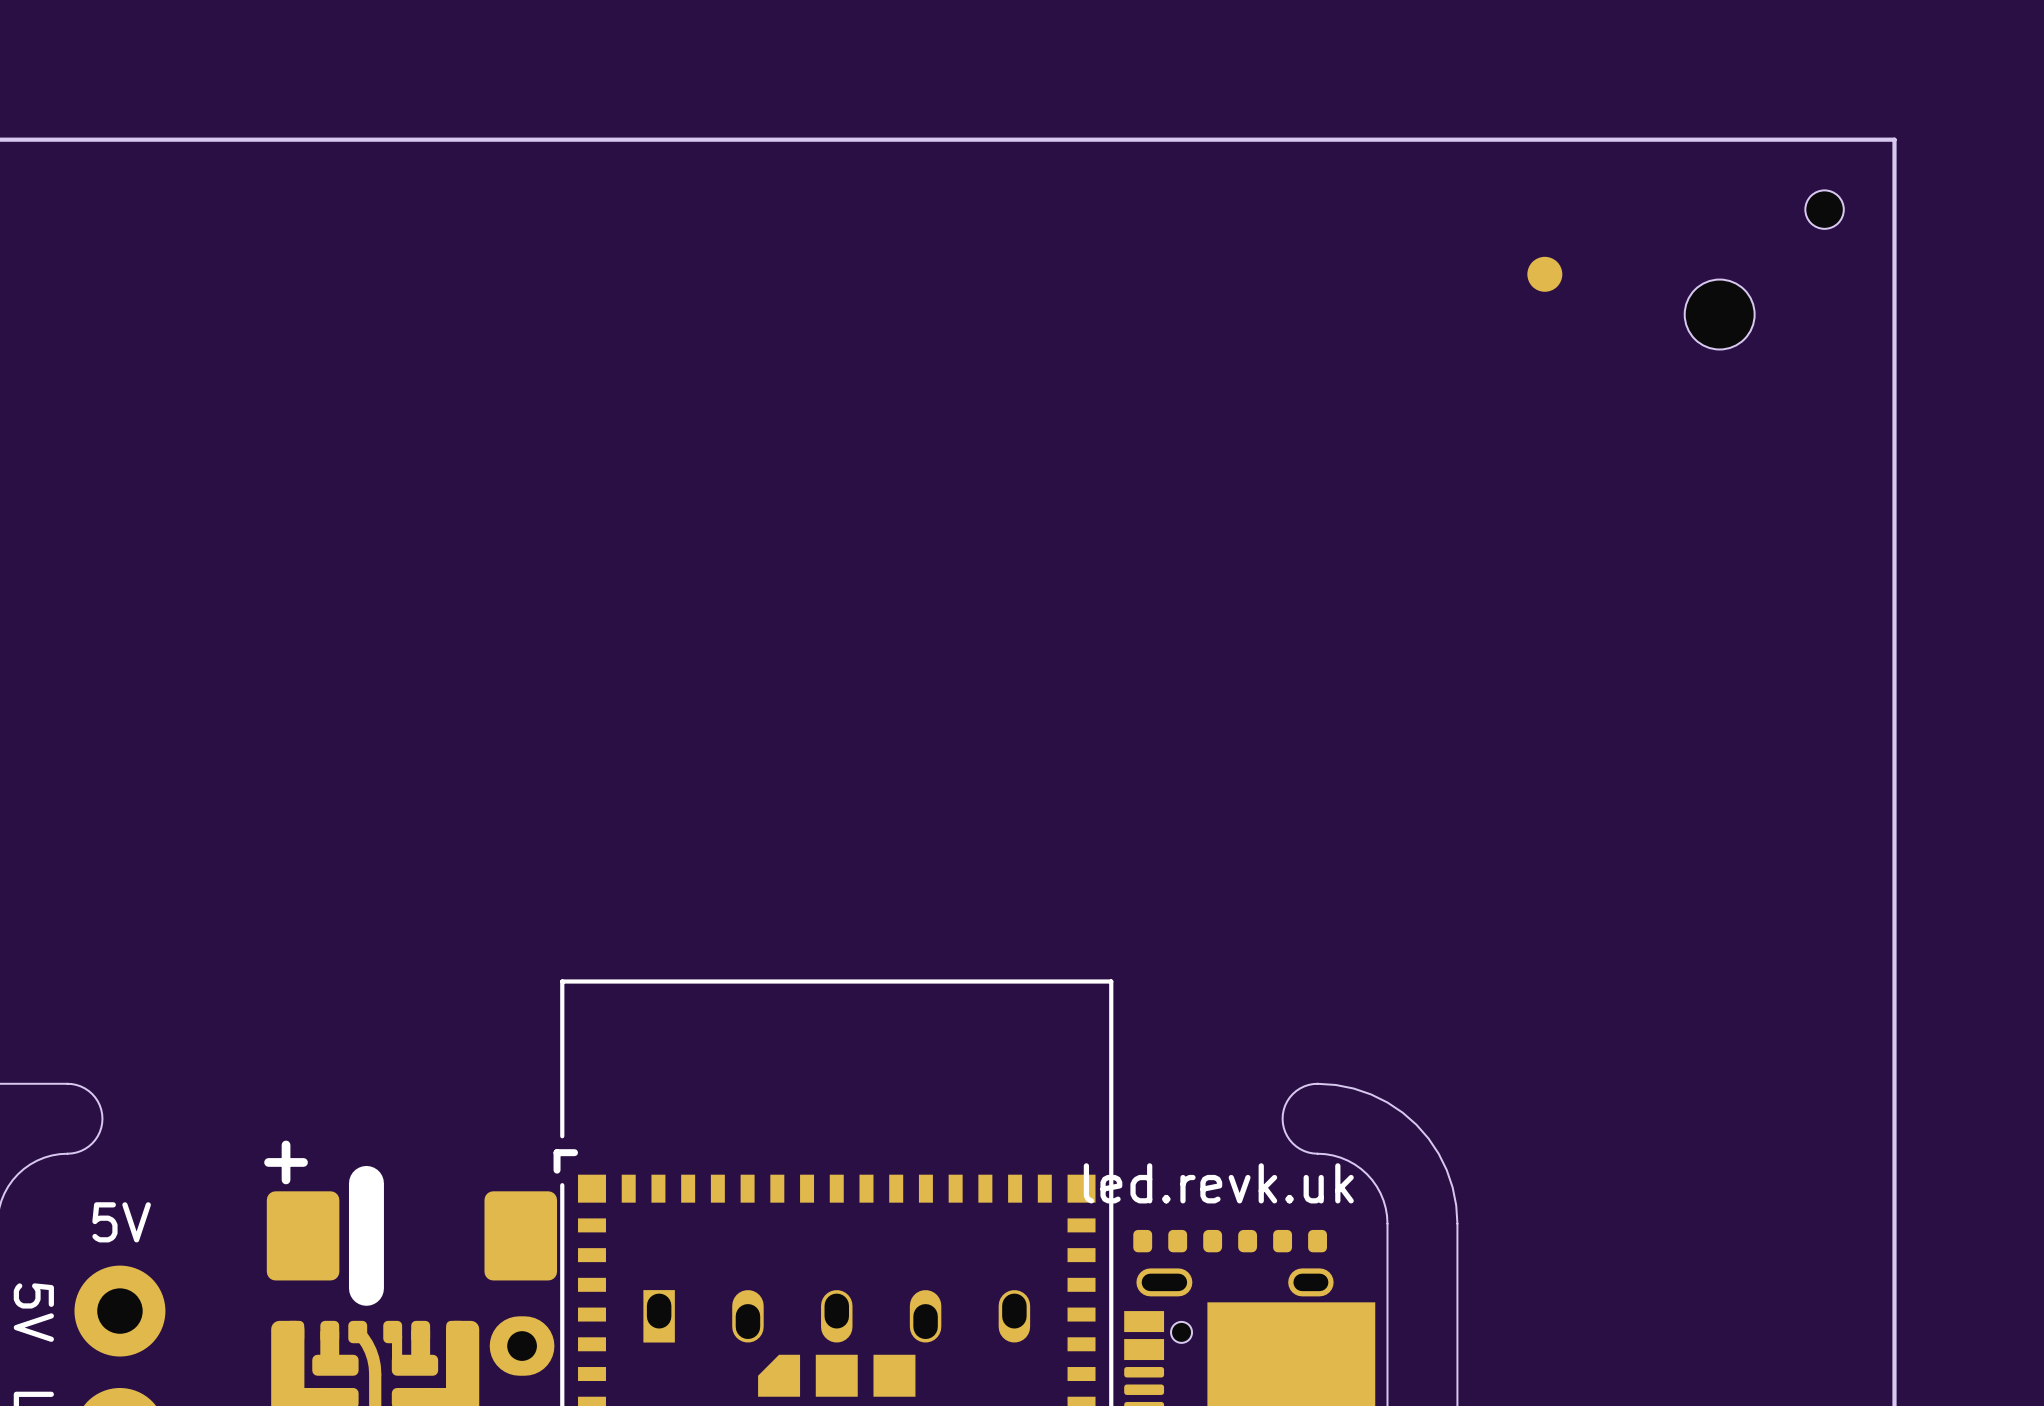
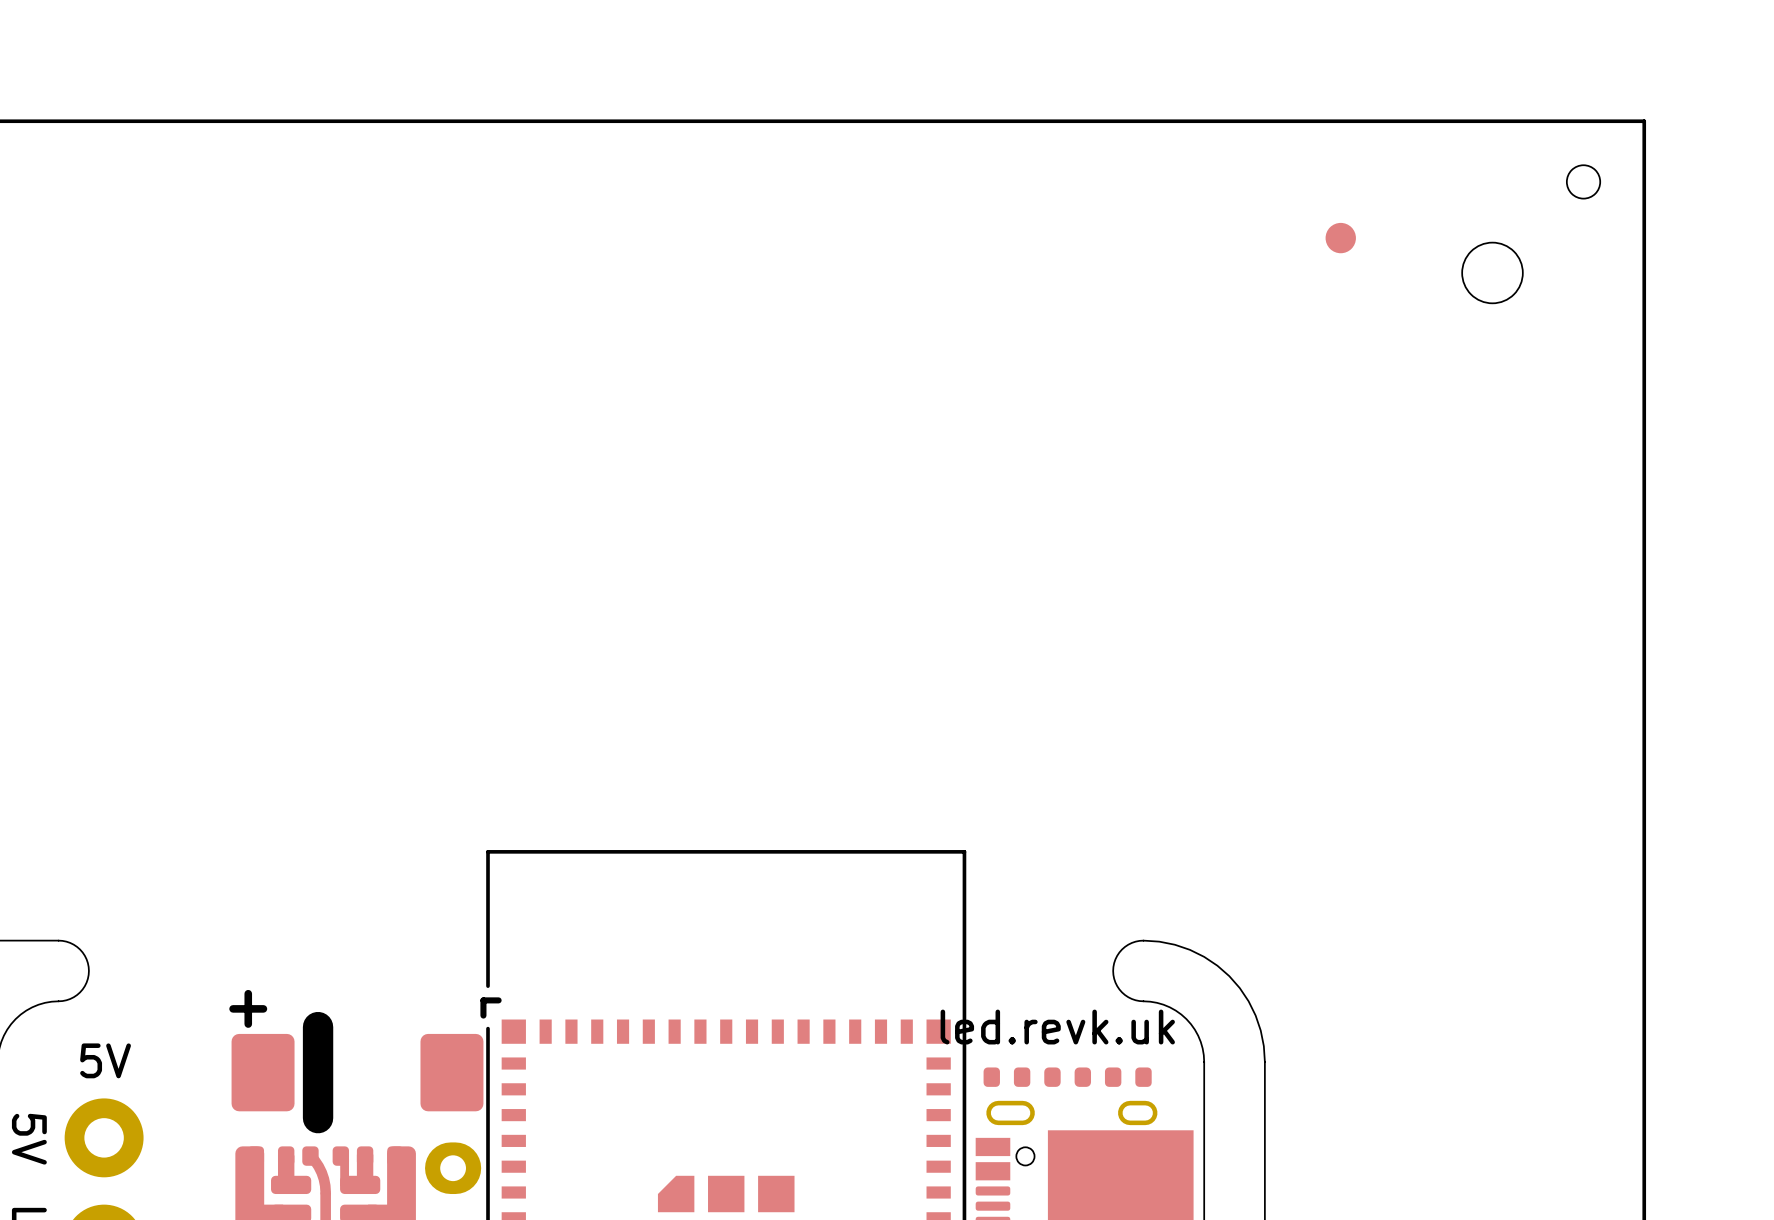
part: (836, 1316) -> none

